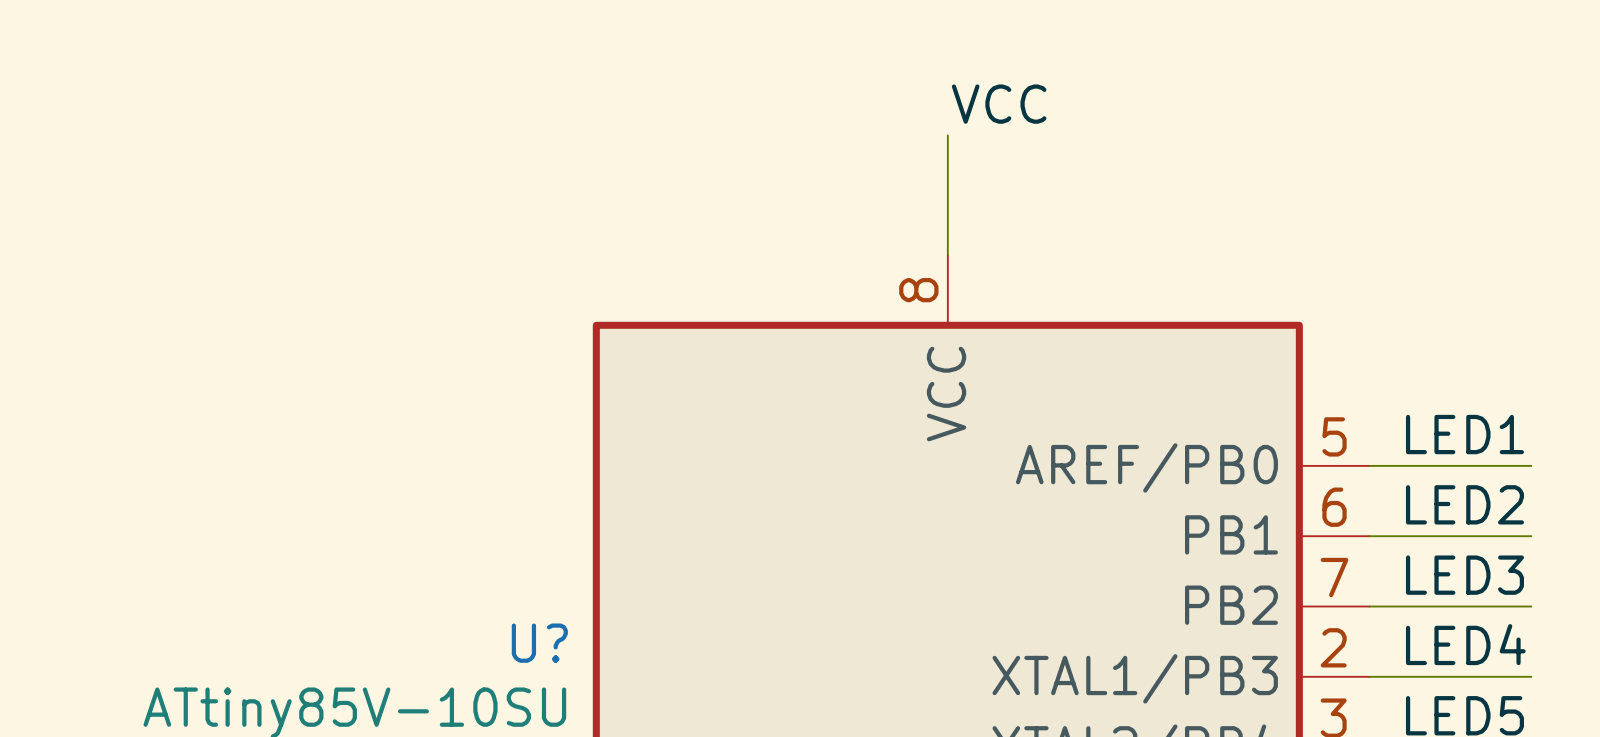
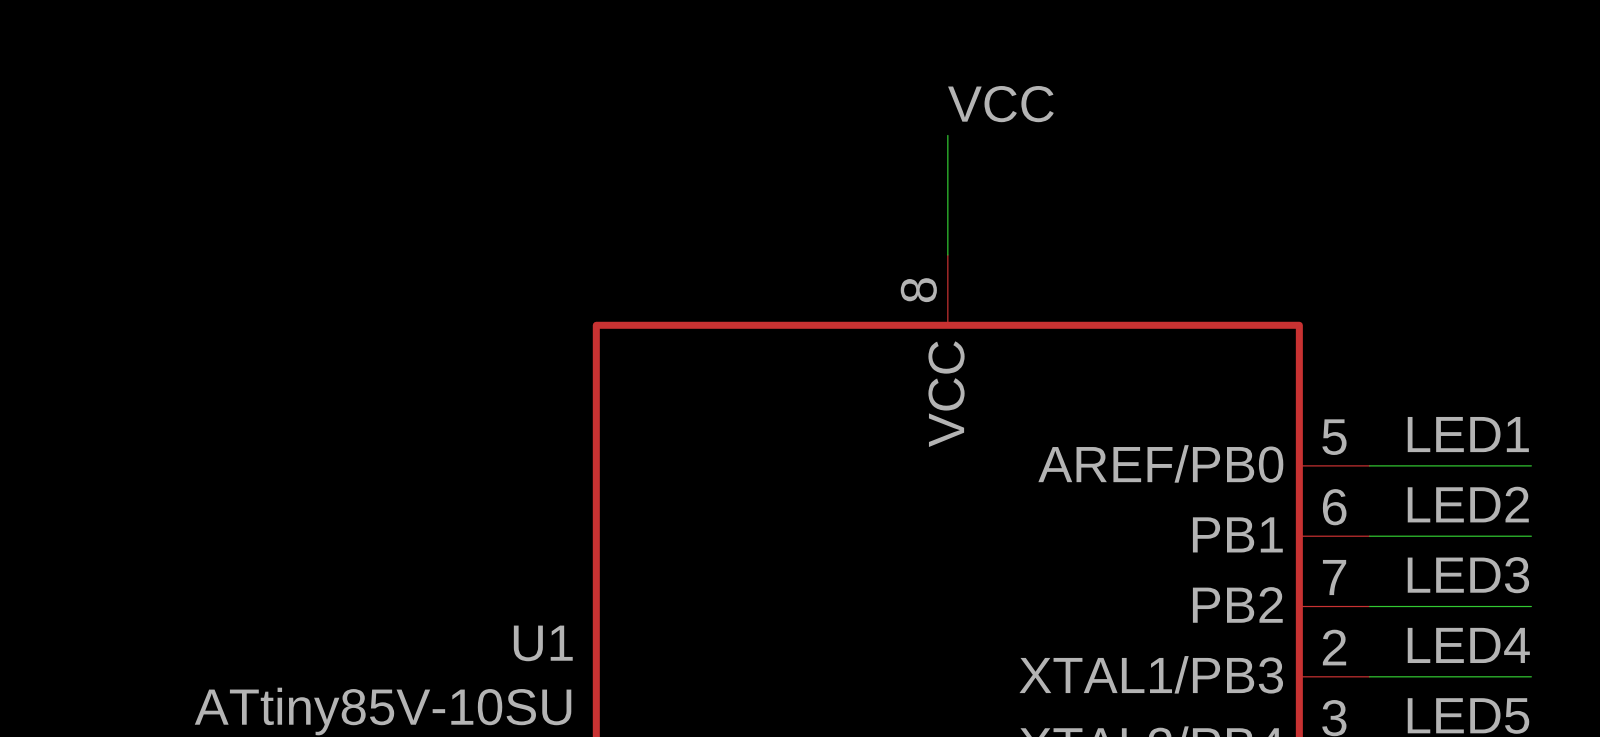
U? name: U? (539, 643) -> U1 (543, 643)

